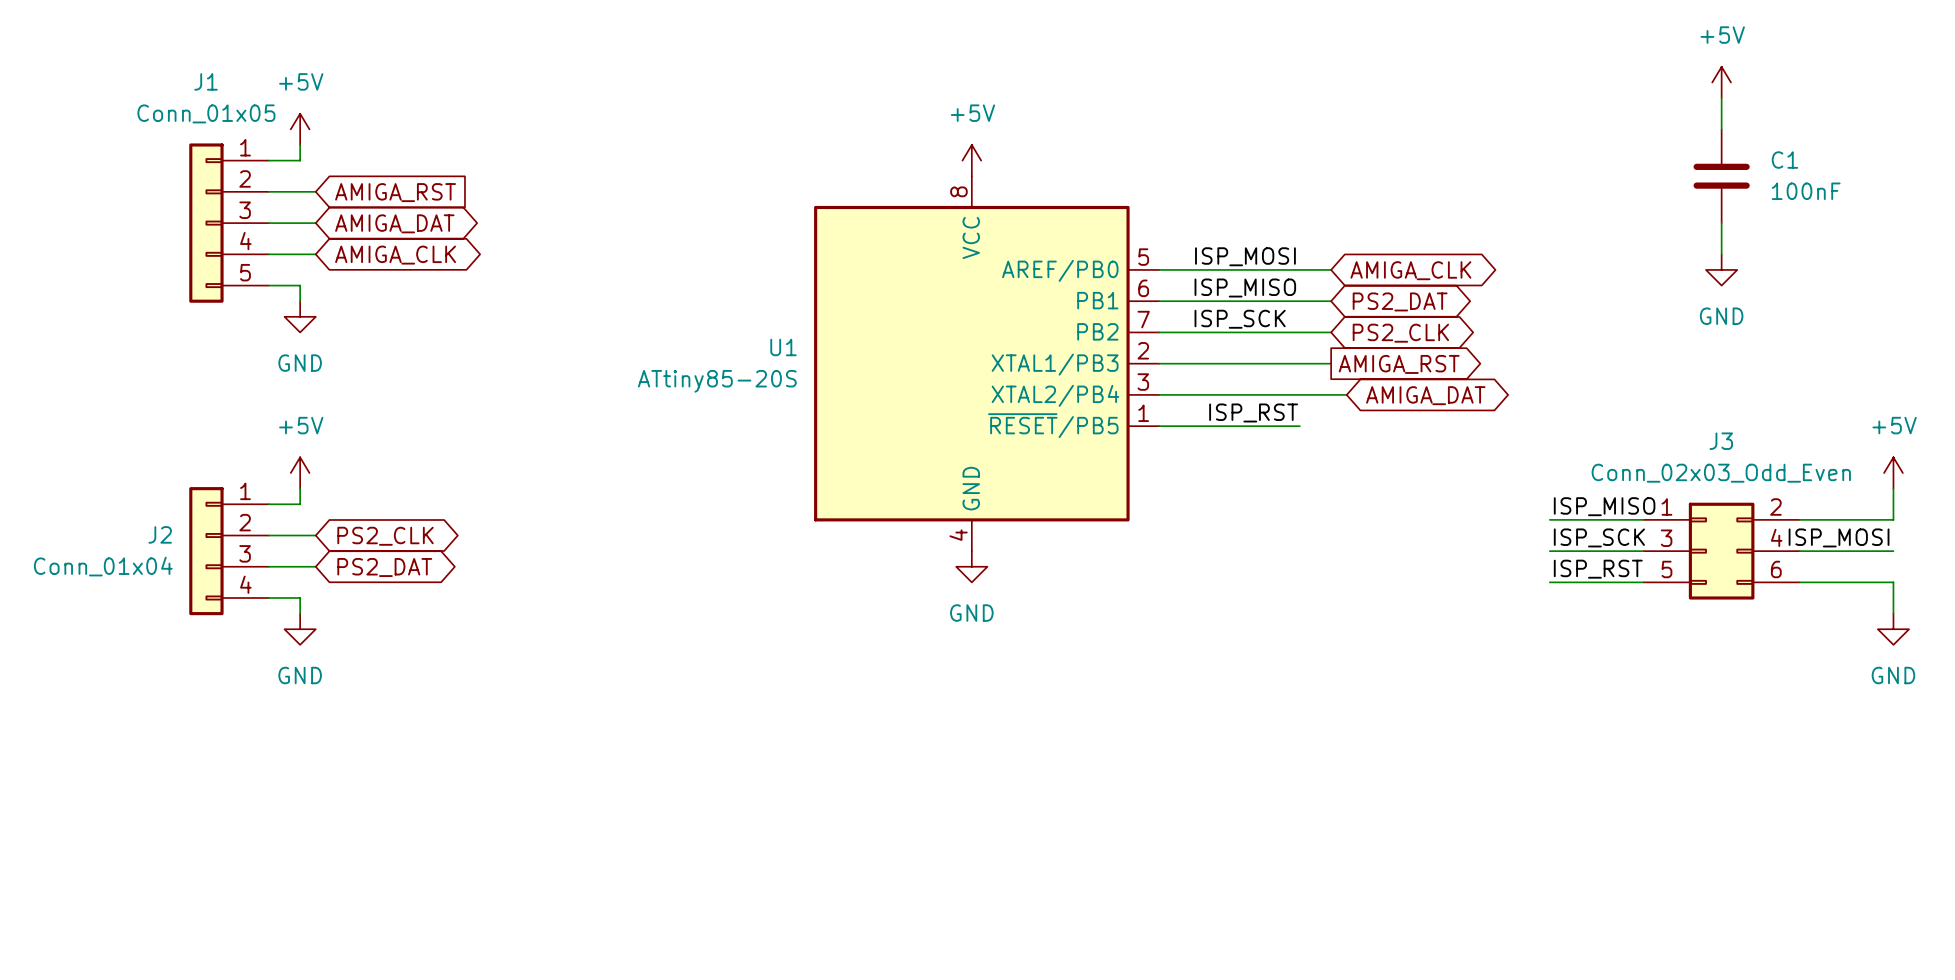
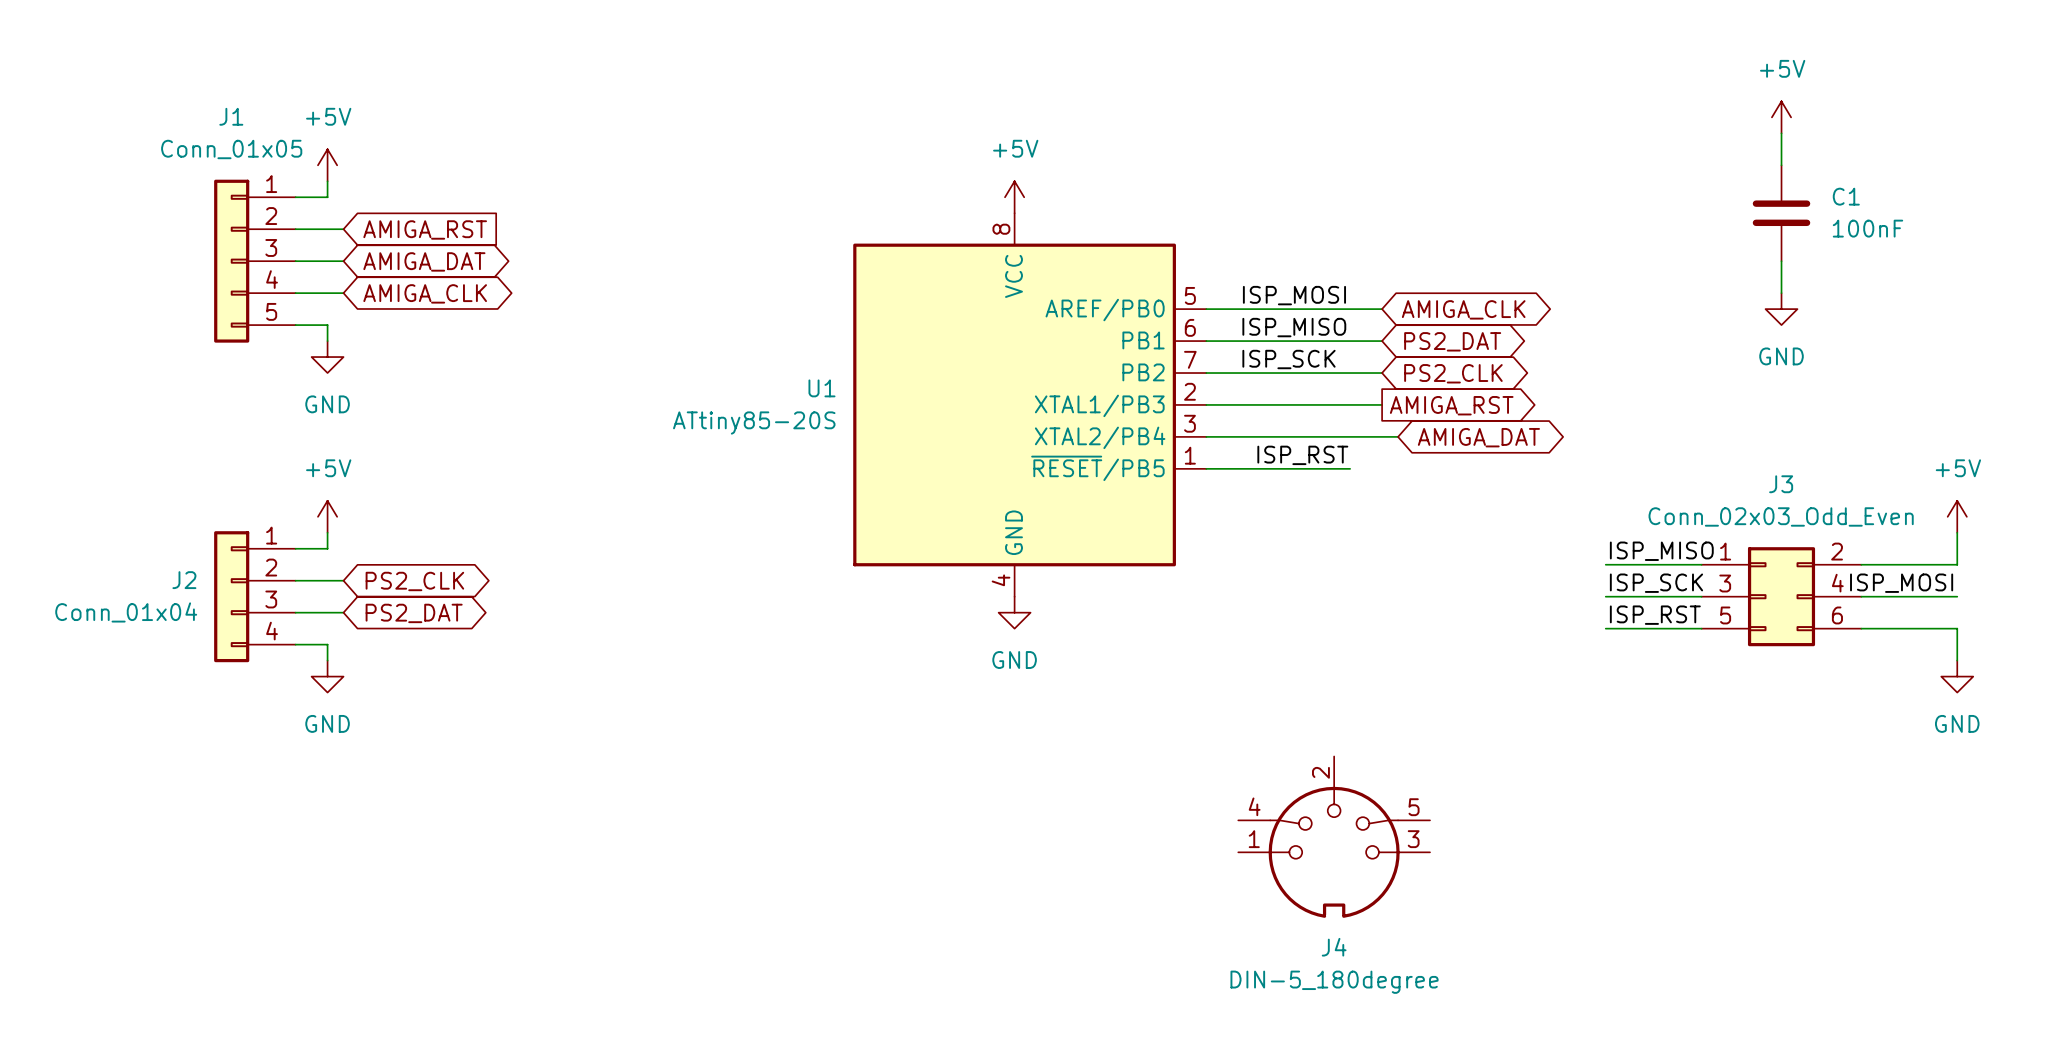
J4: none -> DIN-5_180degree (1334, 837)

